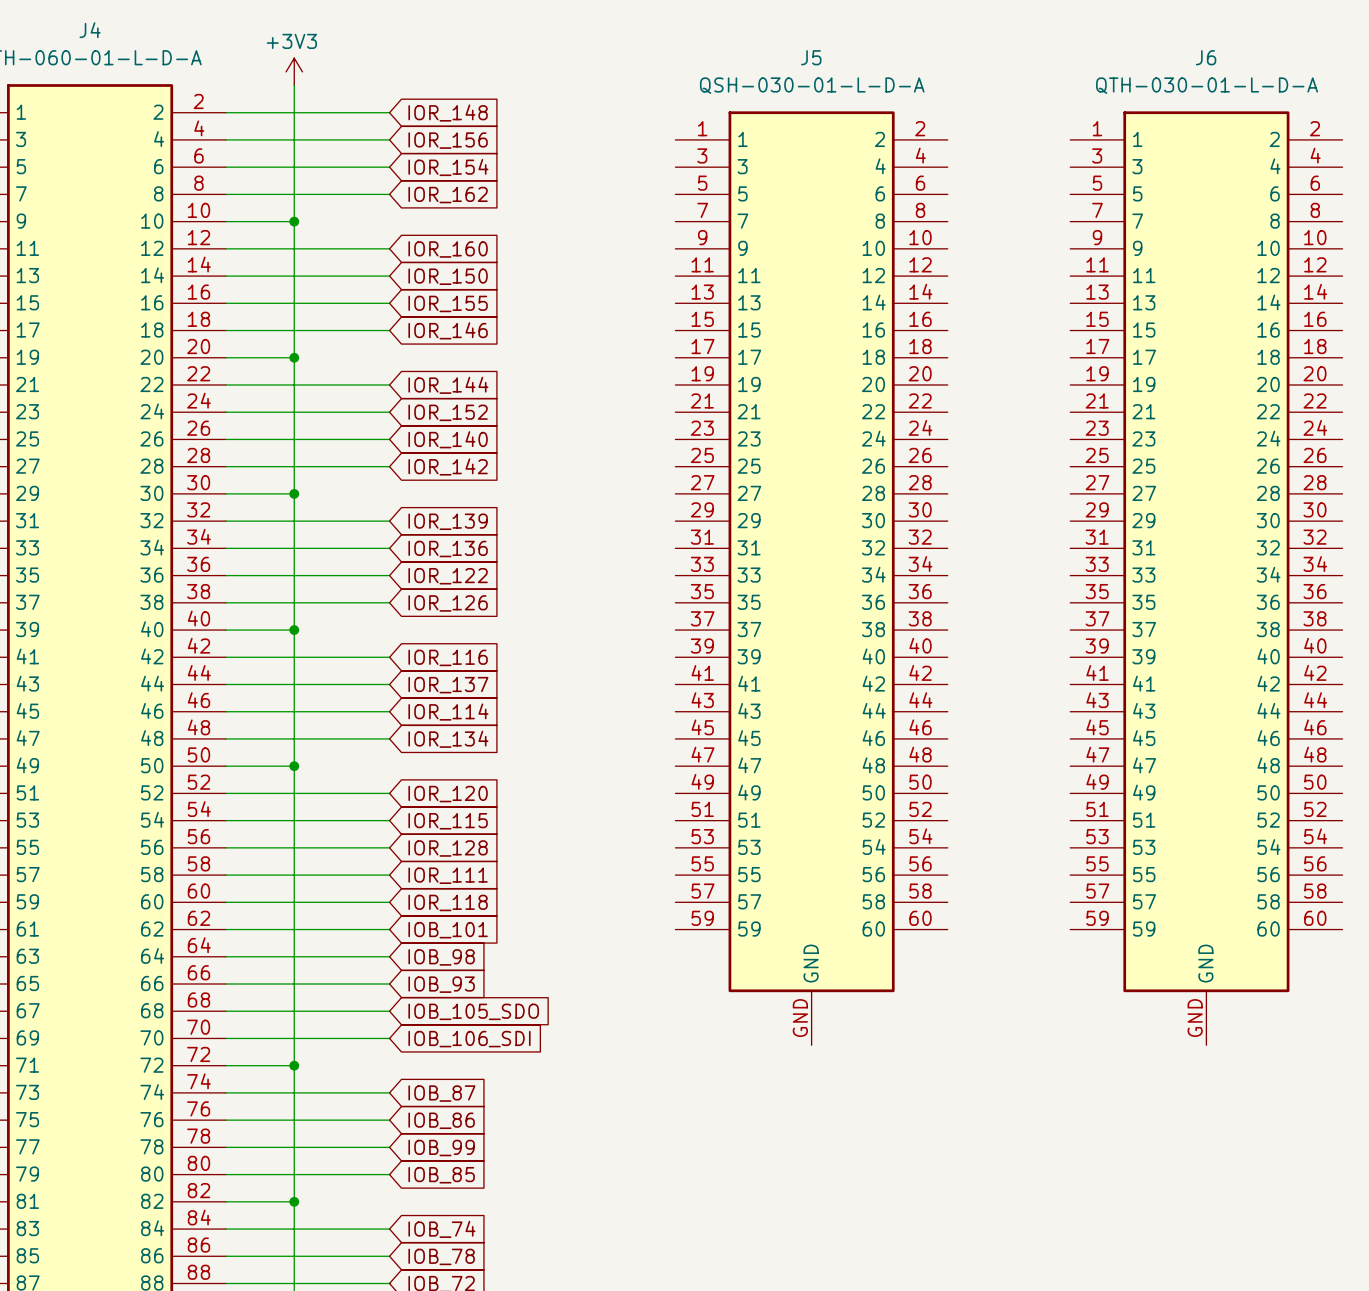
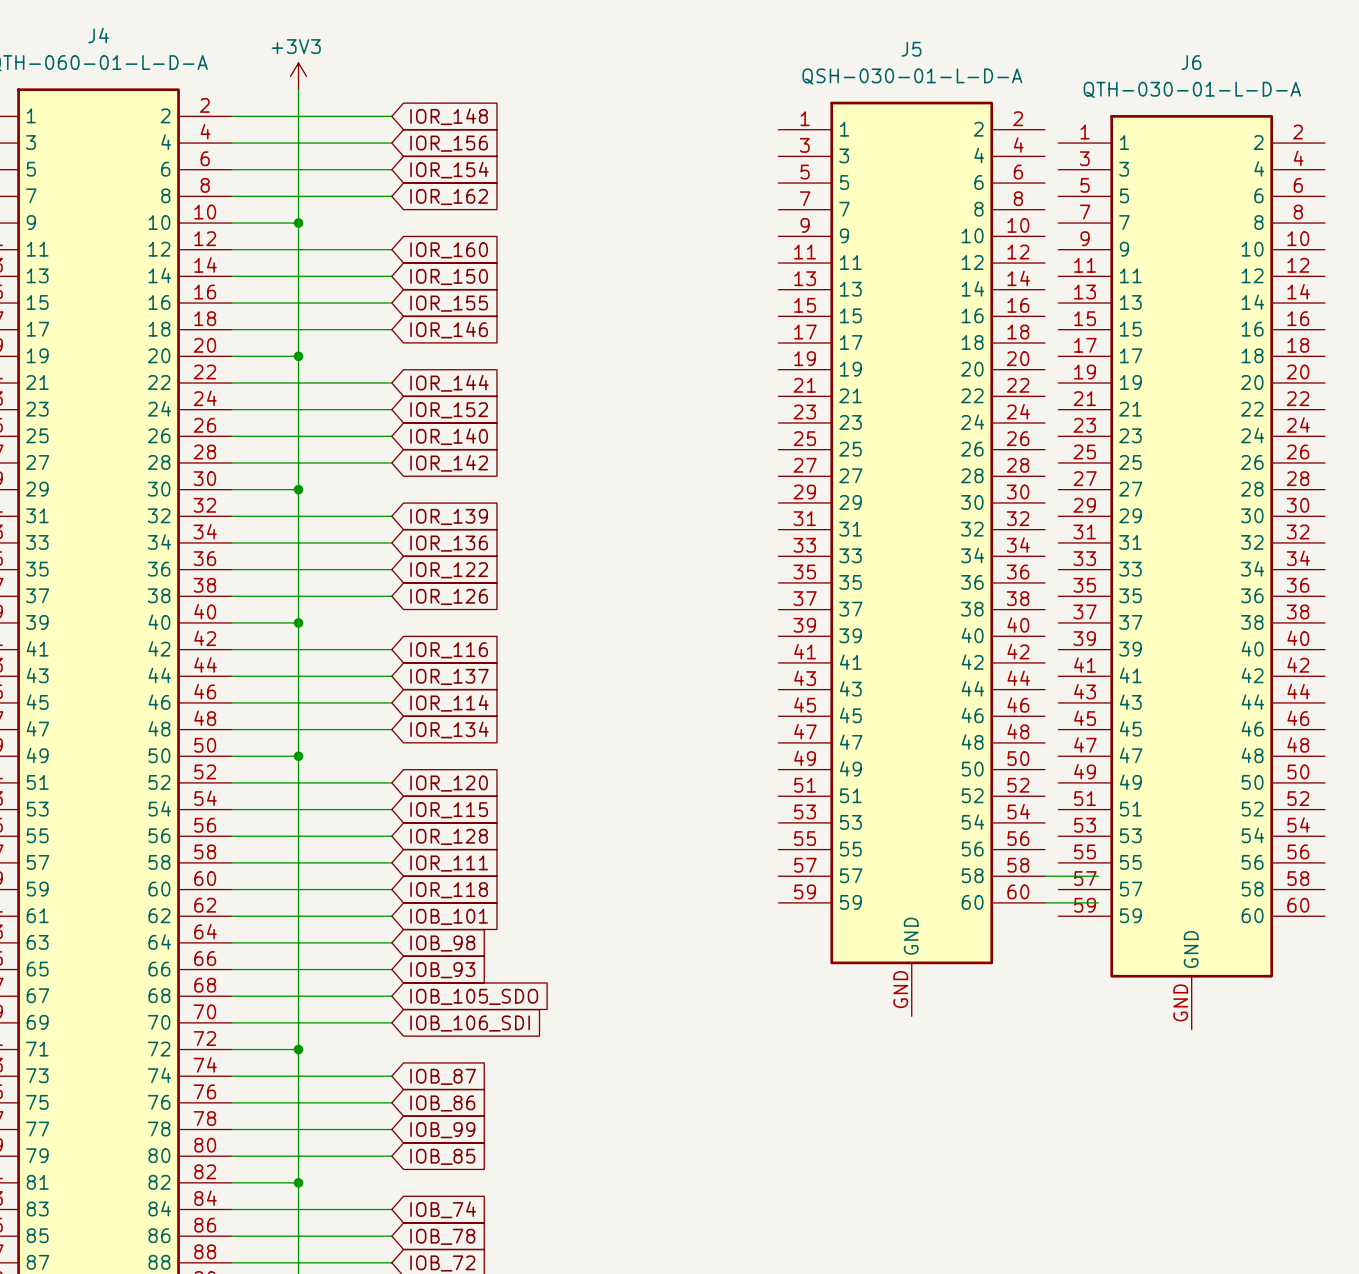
J5 position: (811, 578) -> (911, 558)
wire: none -> (1045, 876) (1098, 876)
wire: none -> (1045, 902) (1098, 902)

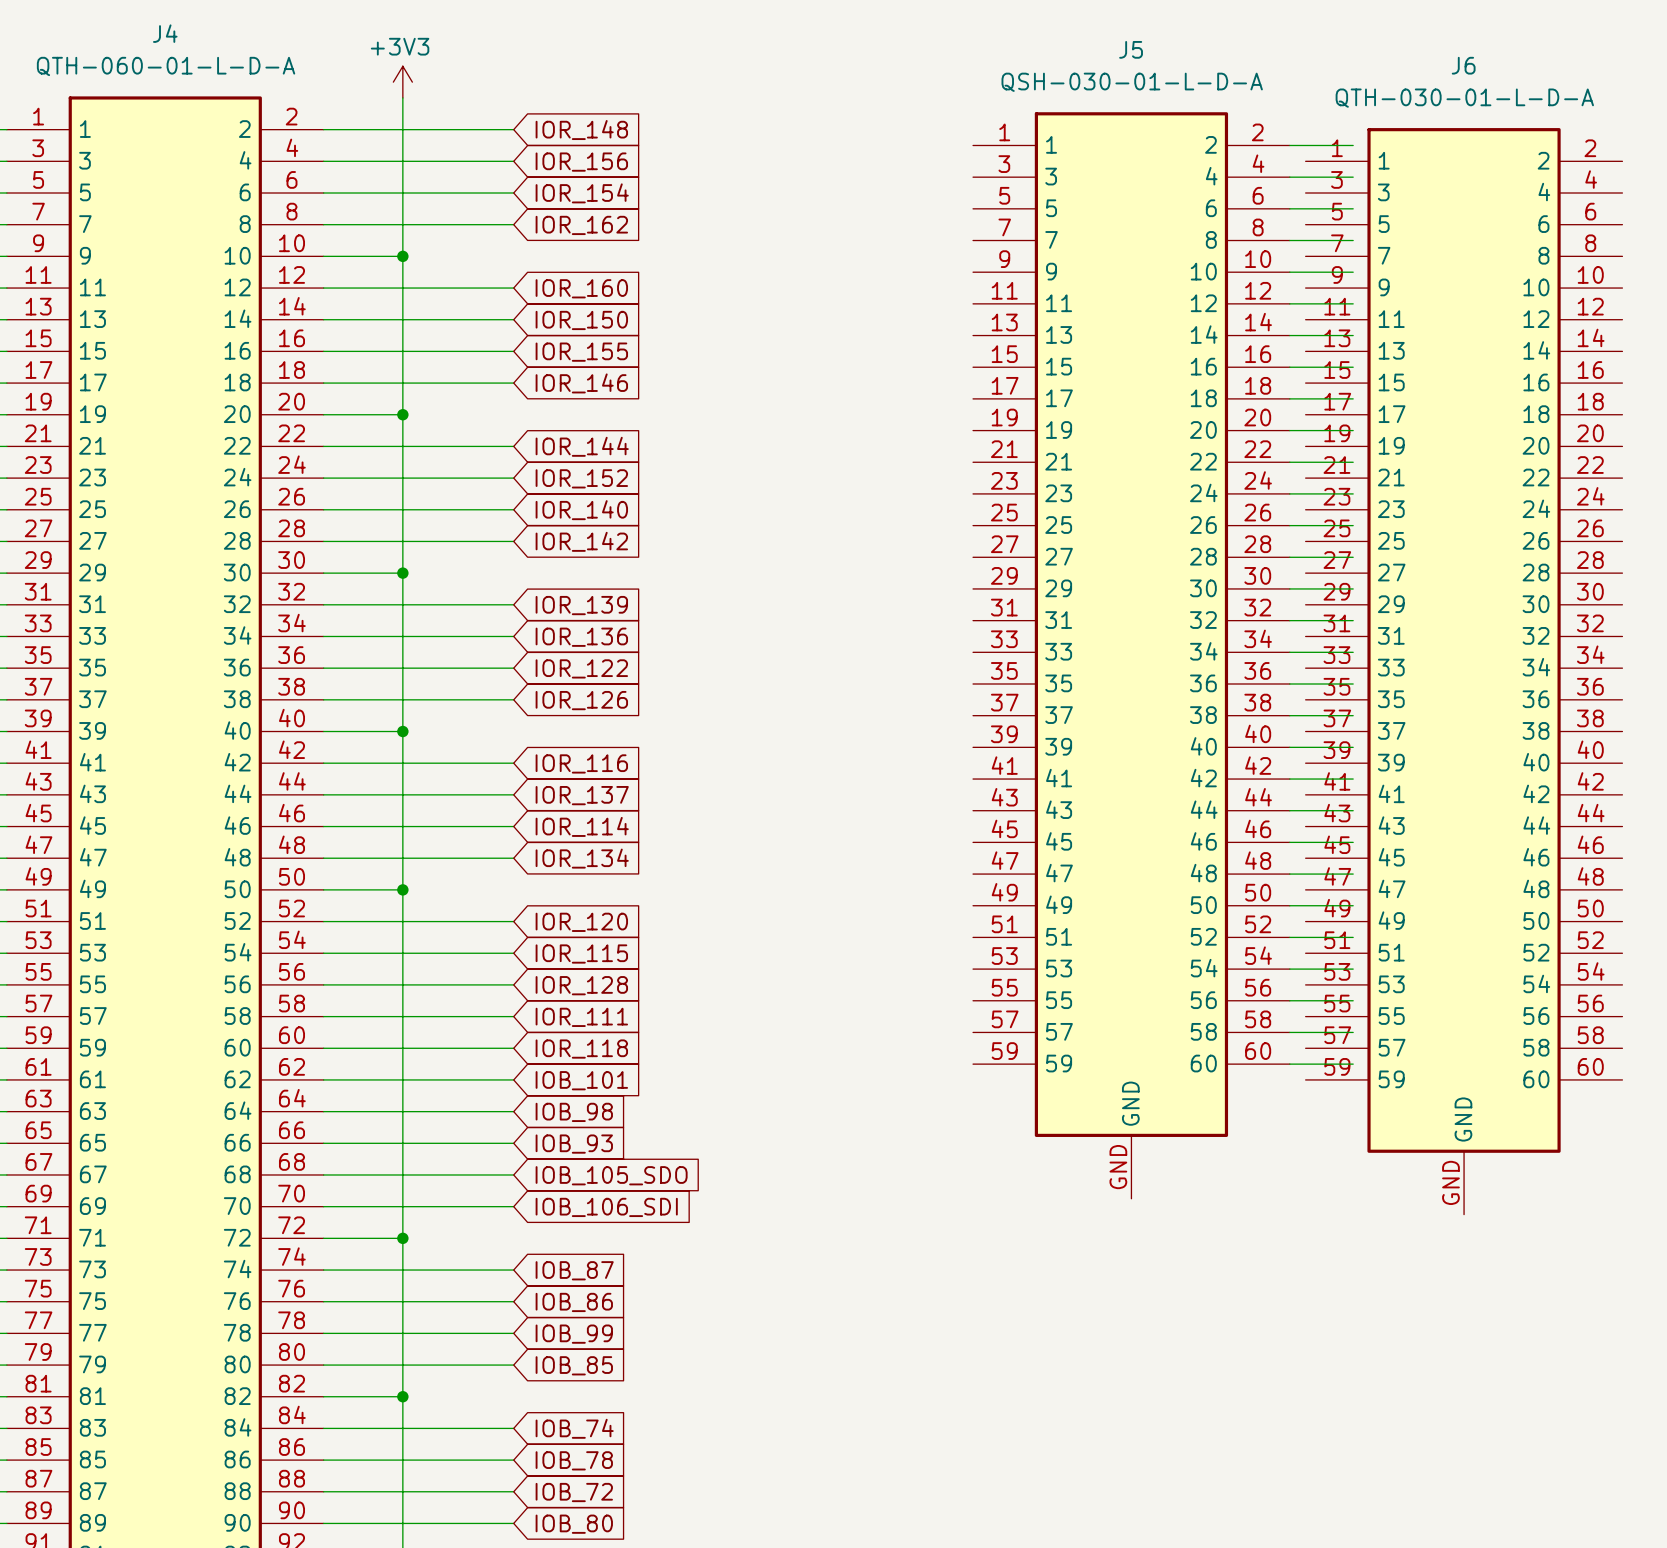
wire: none -> (1289, 145) (1353, 145)
wire: none -> (1289, 177) (1353, 177)
wire: none -> (1289, 208) (1353, 208)
wire: none -> (1289, 240) (1353, 240)
wire: none -> (1289, 272) (1353, 272)
wire: none -> (1289, 303) (1353, 303)
wire: none -> (1289, 335) (1353, 335)
wire: none -> (1289, 367) (1353, 367)
wire: none -> (1289, 398) (1353, 398)
wire: none -> (1289, 430) (1353, 430)
wire: none -> (1289, 462) (1353, 462)
wire: none -> (1289, 493) (1353, 493)
wire: none -> (1289, 525) (1353, 525)
wire: none -> (1289, 557) (1353, 557)
wire: none -> (1289, 588) (1353, 588)
wire: none -> (1289, 620) (1353, 620)
wire: none -> (1289, 652) (1353, 652)
wire: none -> (1289, 683) (1353, 683)
wire: none -> (1289, 715) (1353, 715)
wire: none -> (1289, 747) (1353, 747)
wire: none -> (1289, 779) (1353, 779)
wire: none -> (1289, 810) (1353, 810)
wire: none -> (1289, 842) (1353, 842)
wire: none -> (1289, 874) (1353, 874)
wire: none -> (1289, 905) (1353, 905)
wire: none -> (1289, 937) (1353, 937)
wire: none -> (1289, 969) (1353, 969)
wire: none -> (1289, 1000) (1353, 1000)

